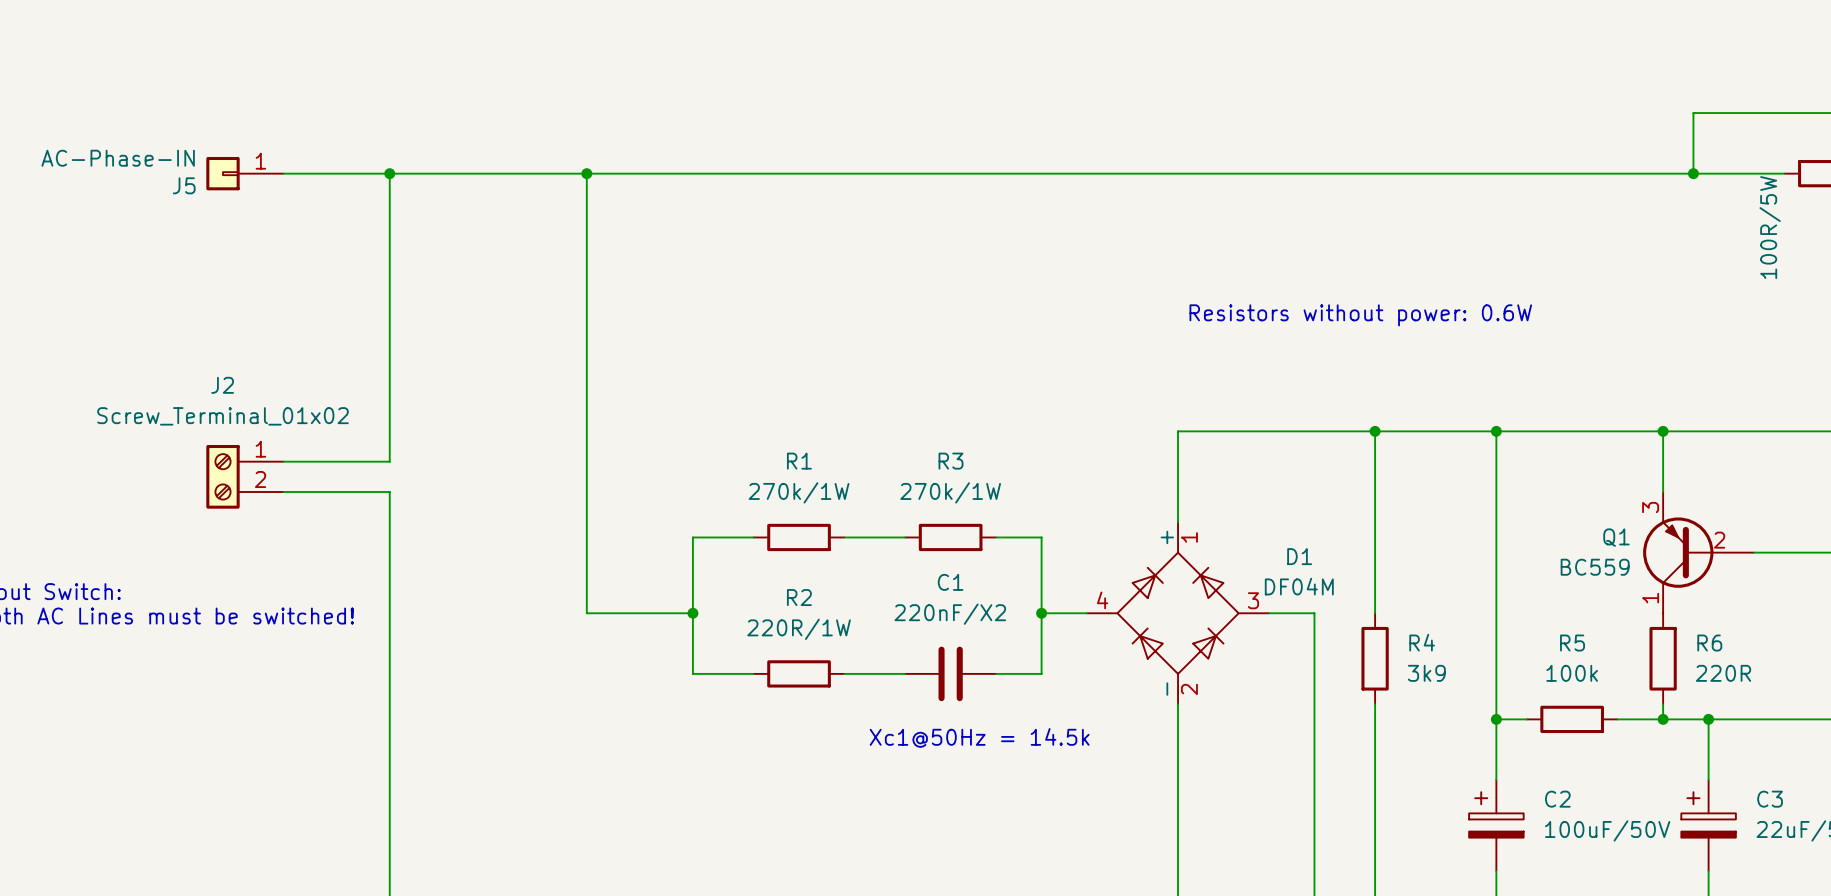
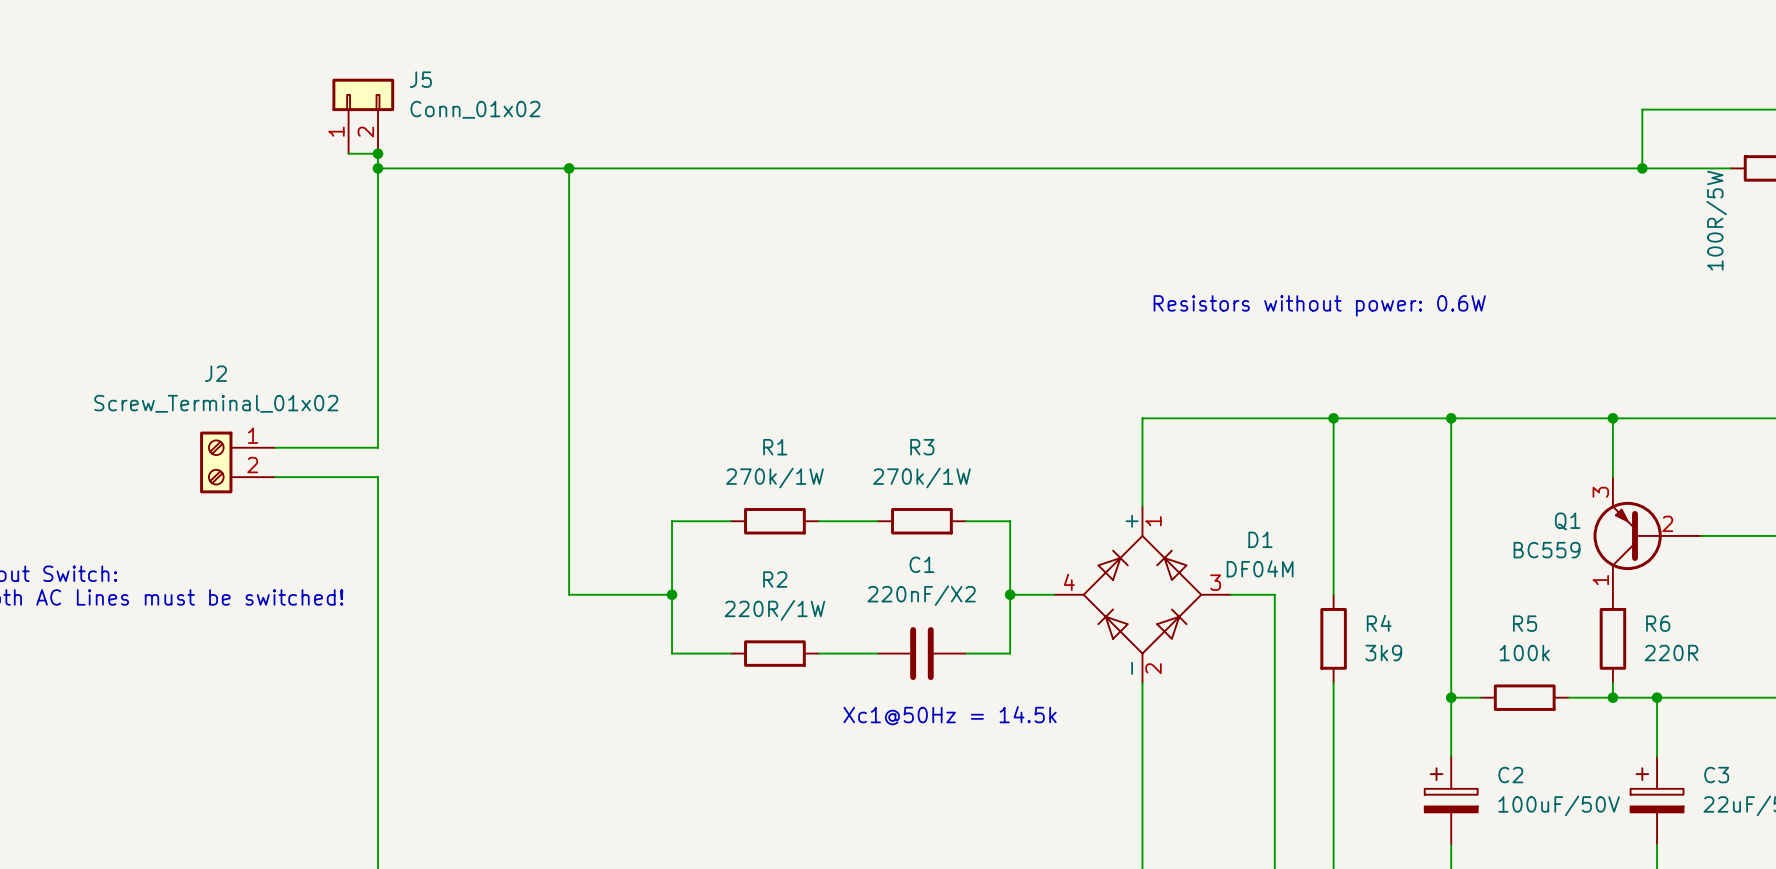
J5 symbol: [206, 156, 284, 191] -> [332, 78, 395, 154]
J5 value: AC-Phase-IN (118, 158) -> Conn_01x02 (475, 109)
junction: none -> (377, 153)
wire: (283, 173) (389, 173) -> (348, 153) (377, 153) (377, 168)
J5 name position: J5 (184, 185) -> J5 (420, 79)

